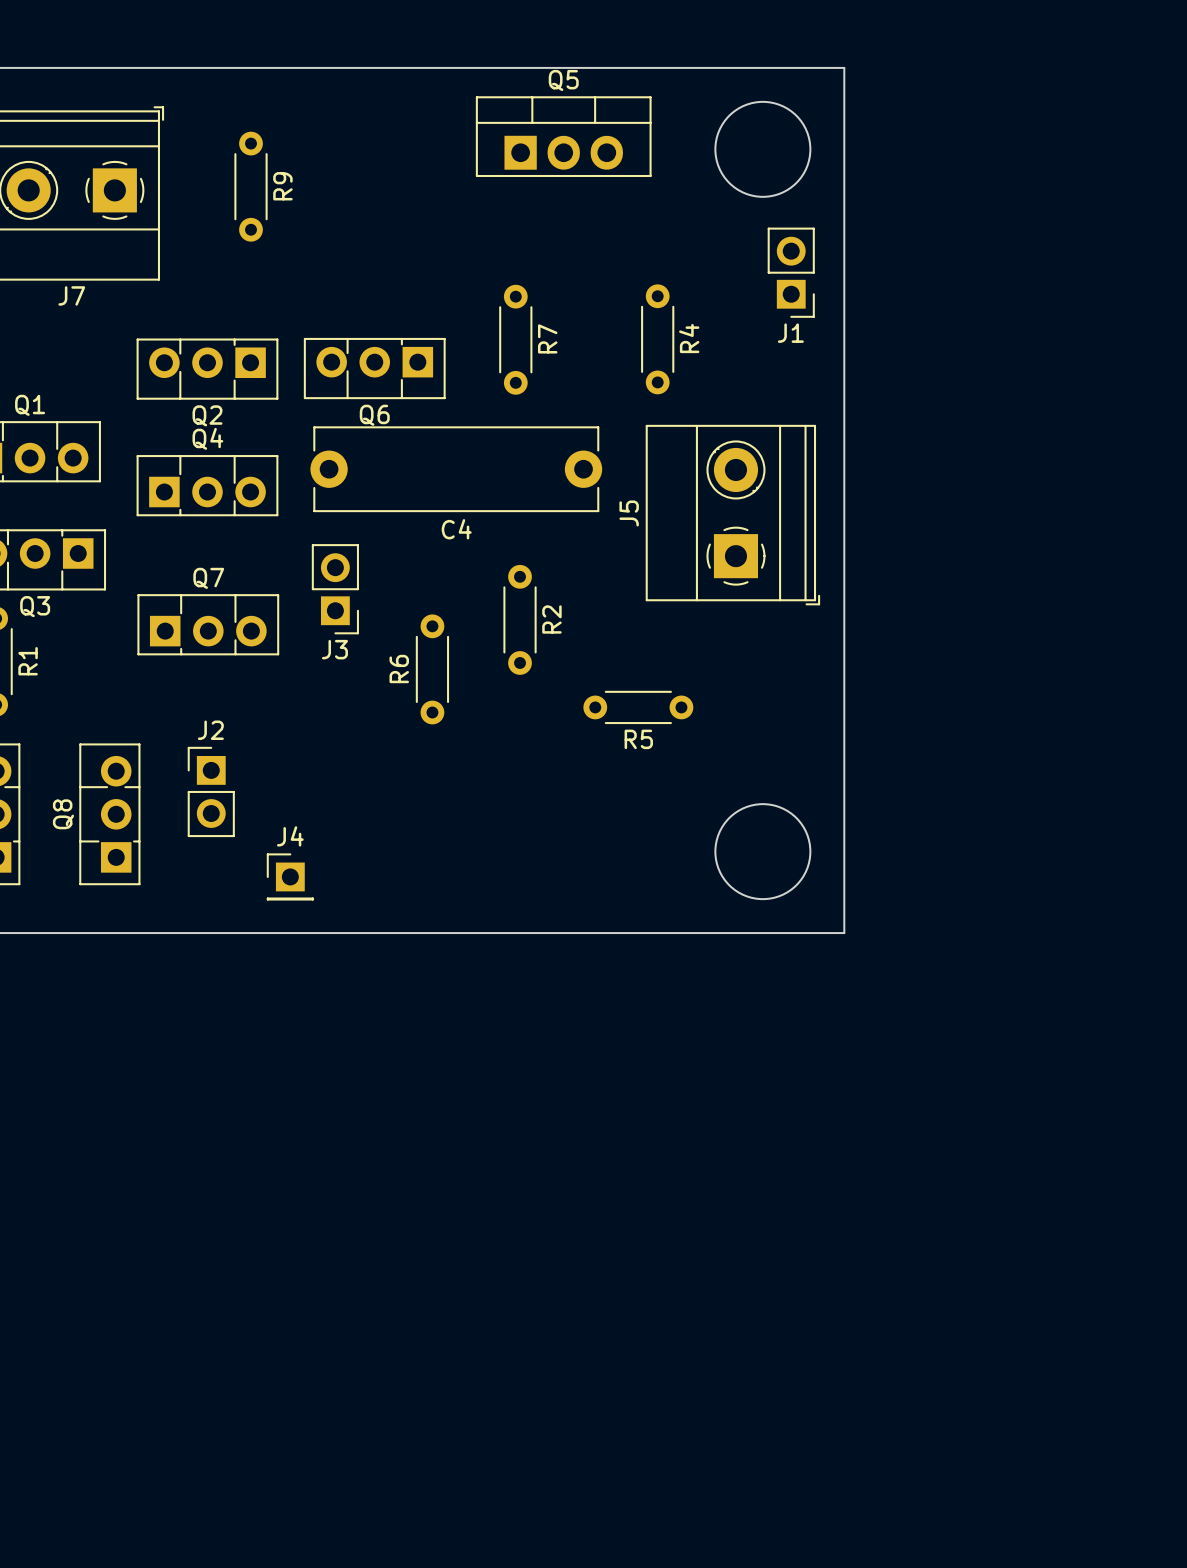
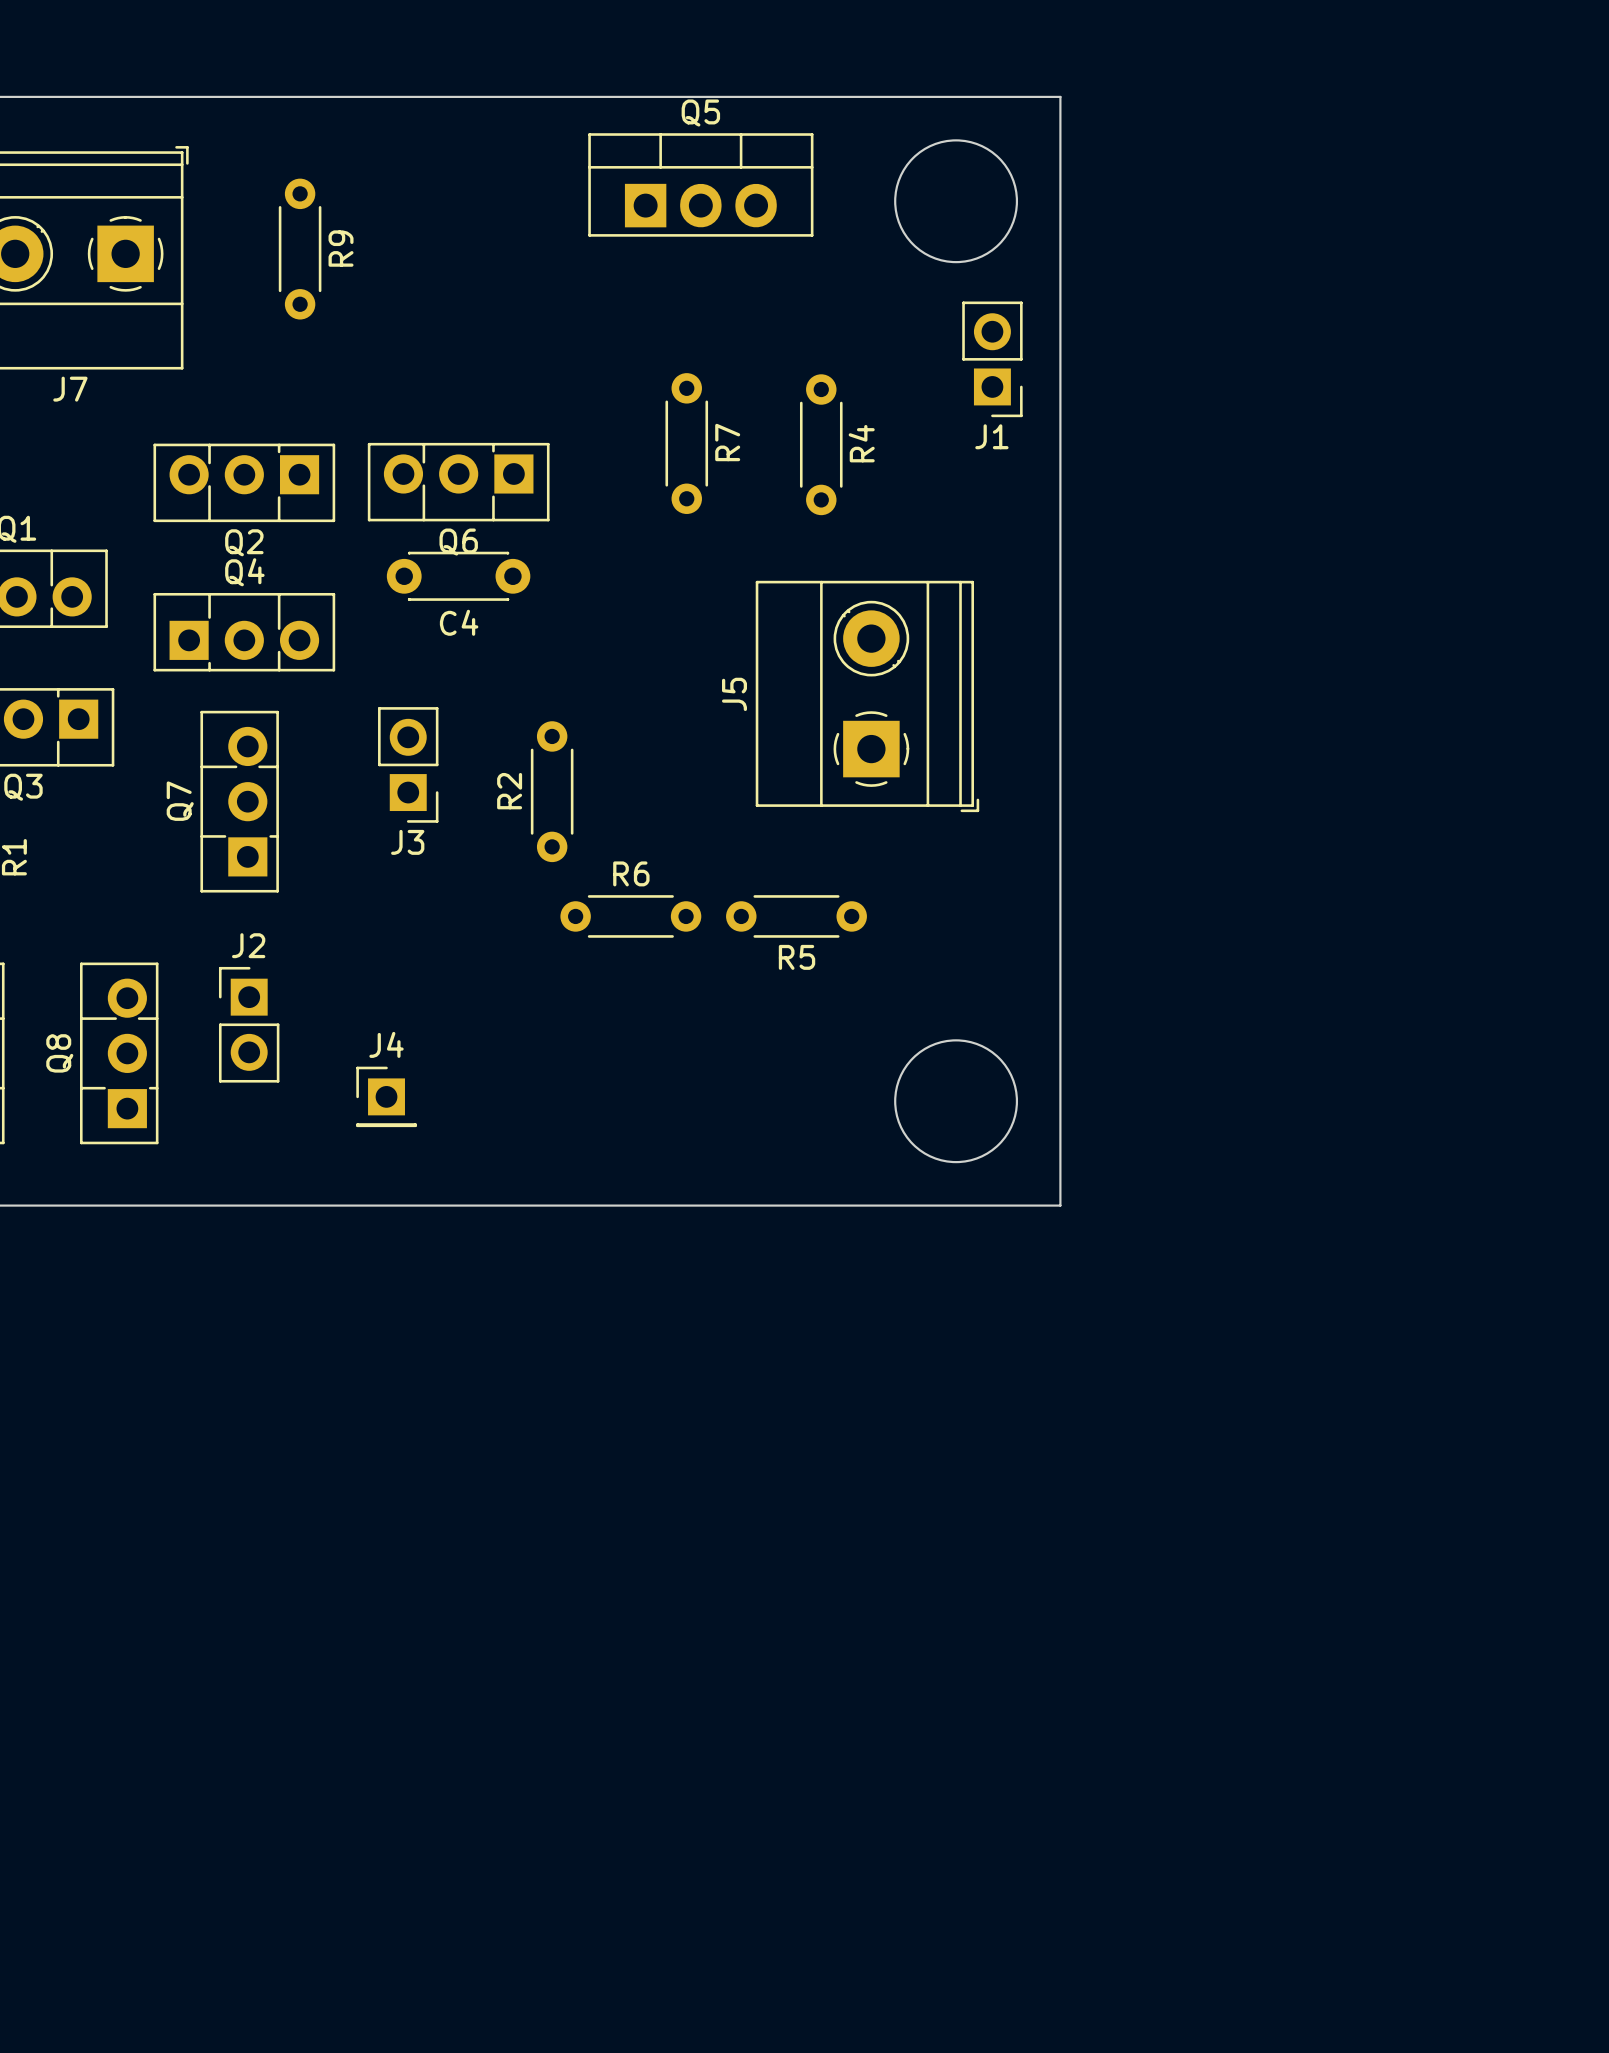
R7 position: (515, 339) -> (686, 443)
C4 footprint: [310, 426, 603, 513] -> [386, 551, 531, 601]
J5 position: (732, 515) -> (867, 696)
R2 position: (520, 619) -> (552, 791)
R2 name position: R2 (551, 619) -> R2 (509, 791)
Q7 rotation: 0° (208, 624) -> 90° counterclockwise (239, 801)
R6 rotation: 0° (432, 669) -> 90° clockwise (630, 916)
R6 position: (432, 669) -> (630, 916)
J4 position: (290, 876) -> (386, 1096)

